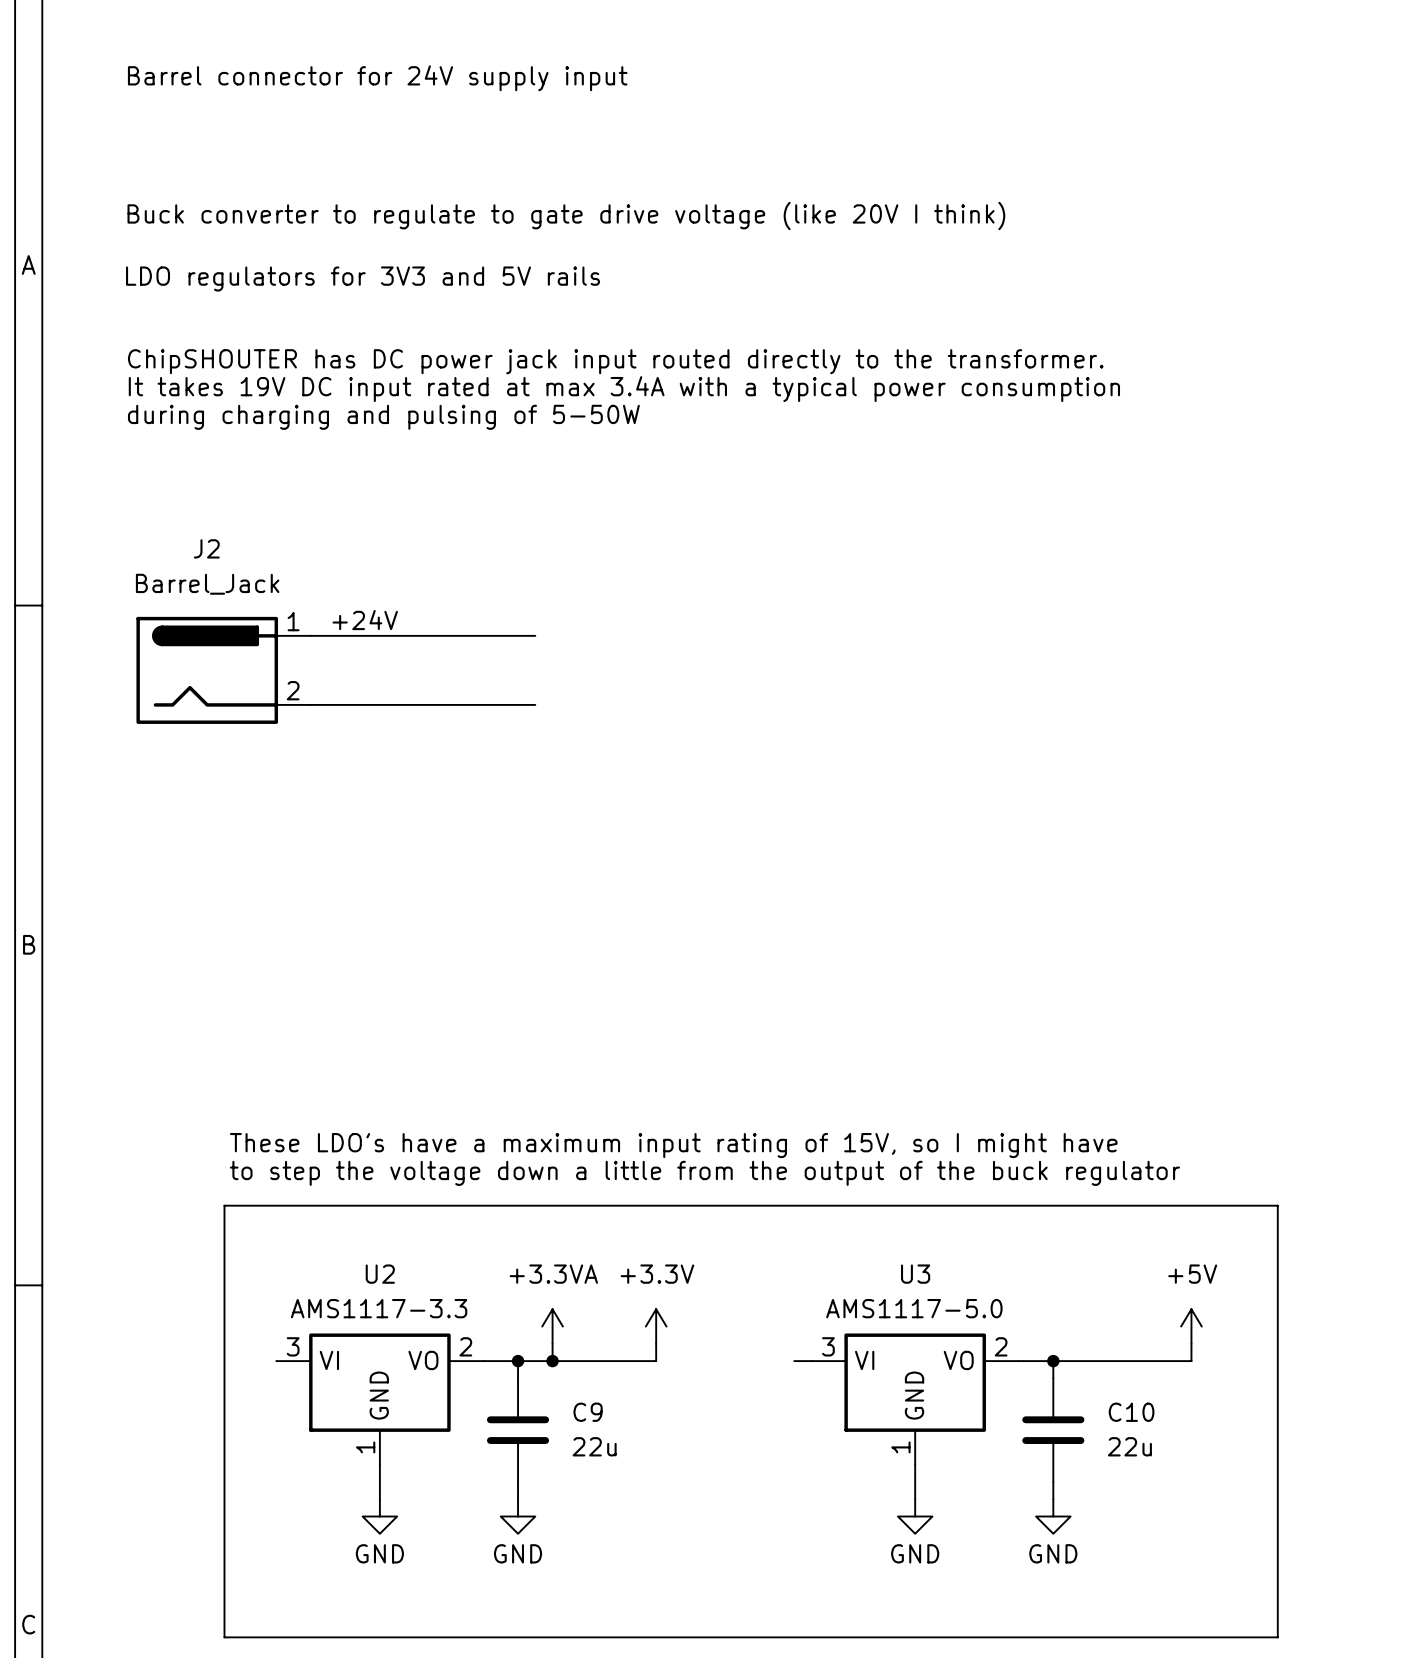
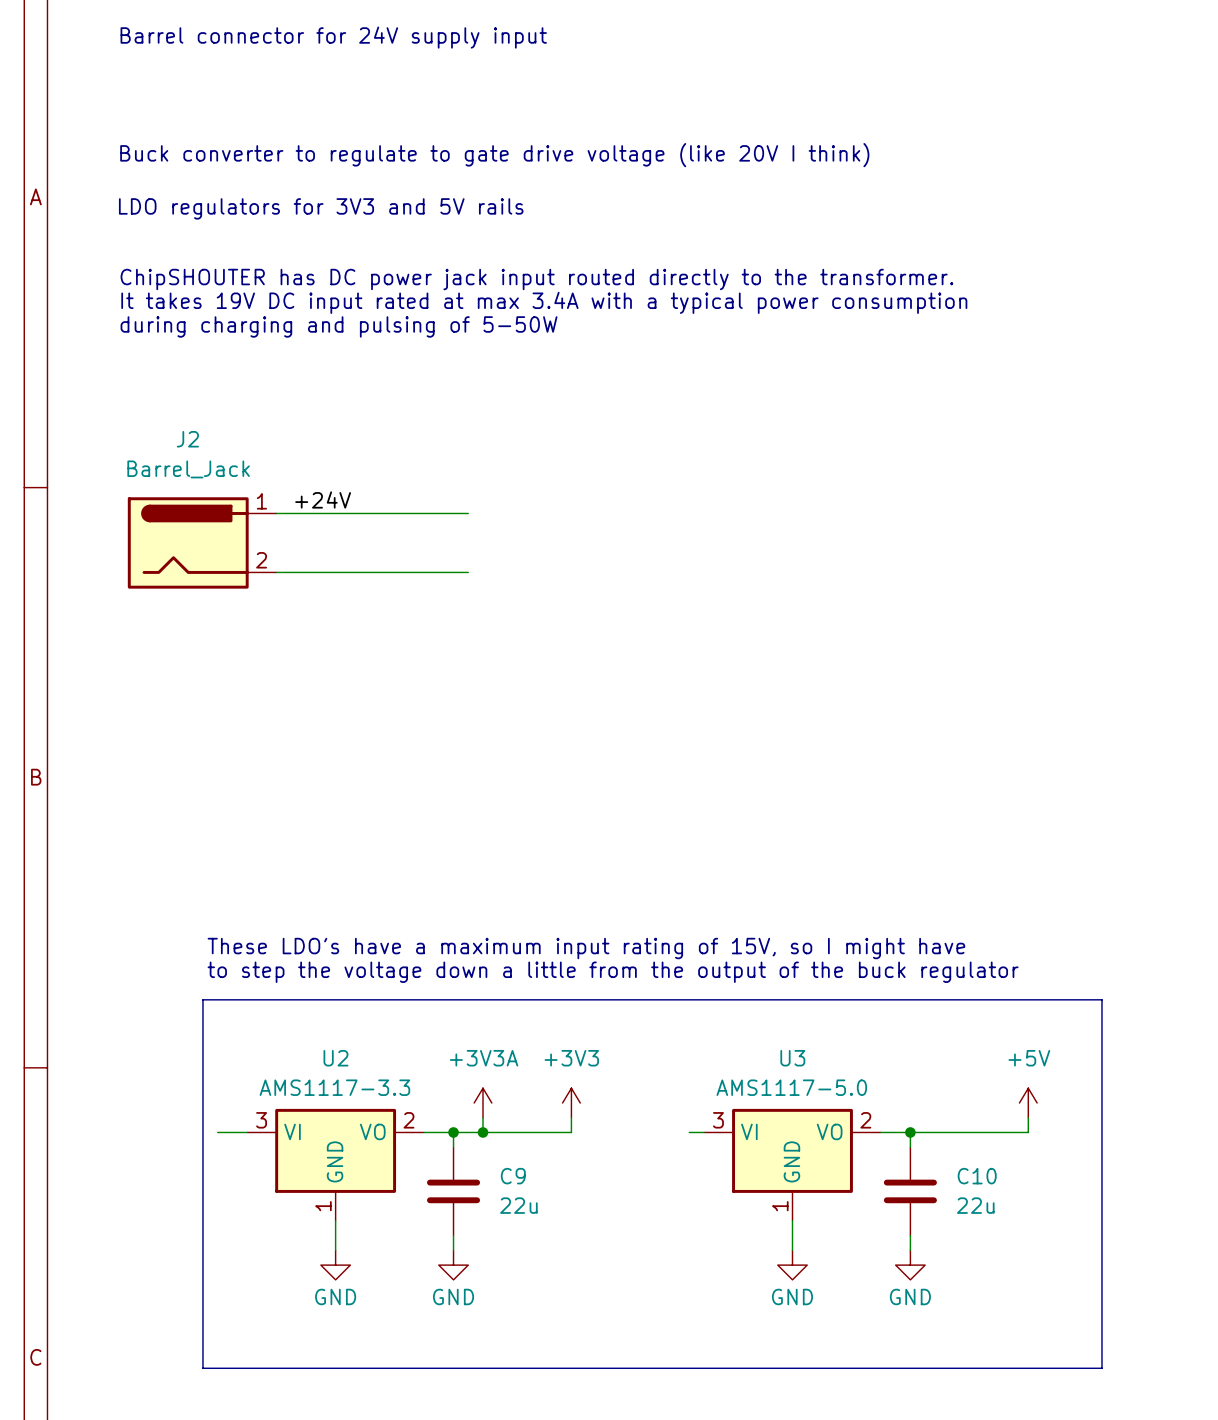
power symbol: +3.3VA (552, 1326) -> +3V3A (483, 1103)
power symbol: +3.3V (656, 1326) -> +3V3 (571, 1103)
wire: none -> (217, 1132) (247, 1132)

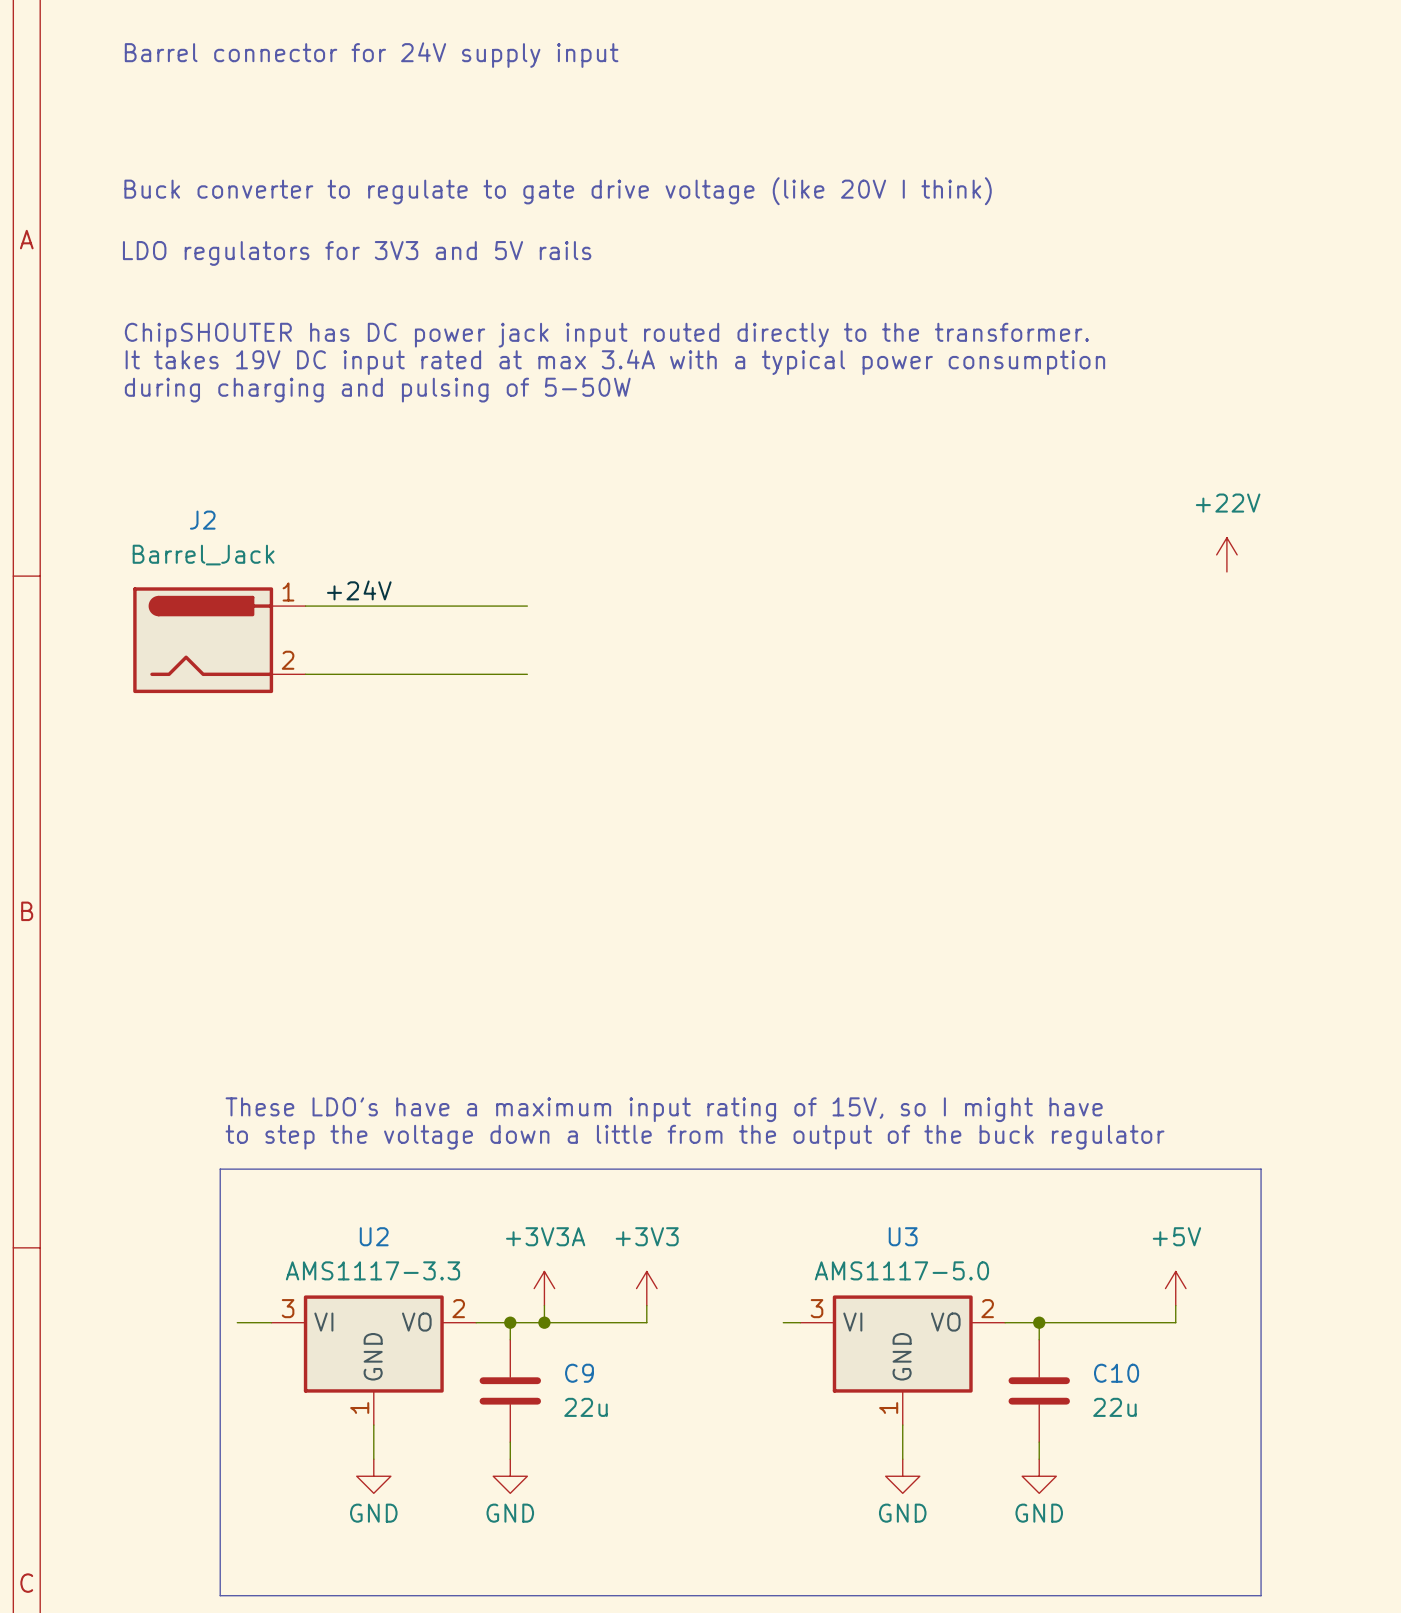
power symbol: none -> +22V (1226, 554)

